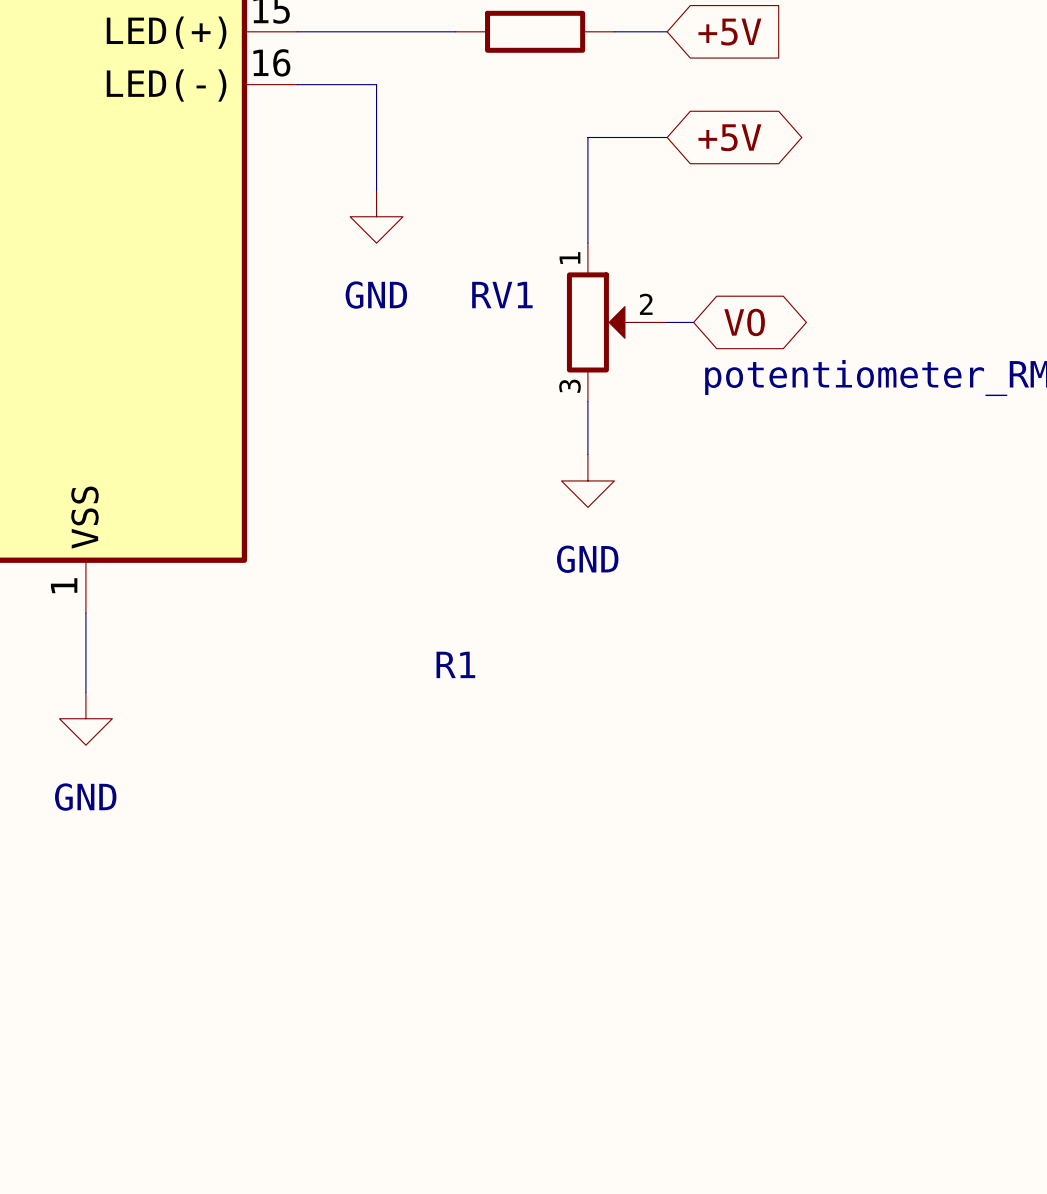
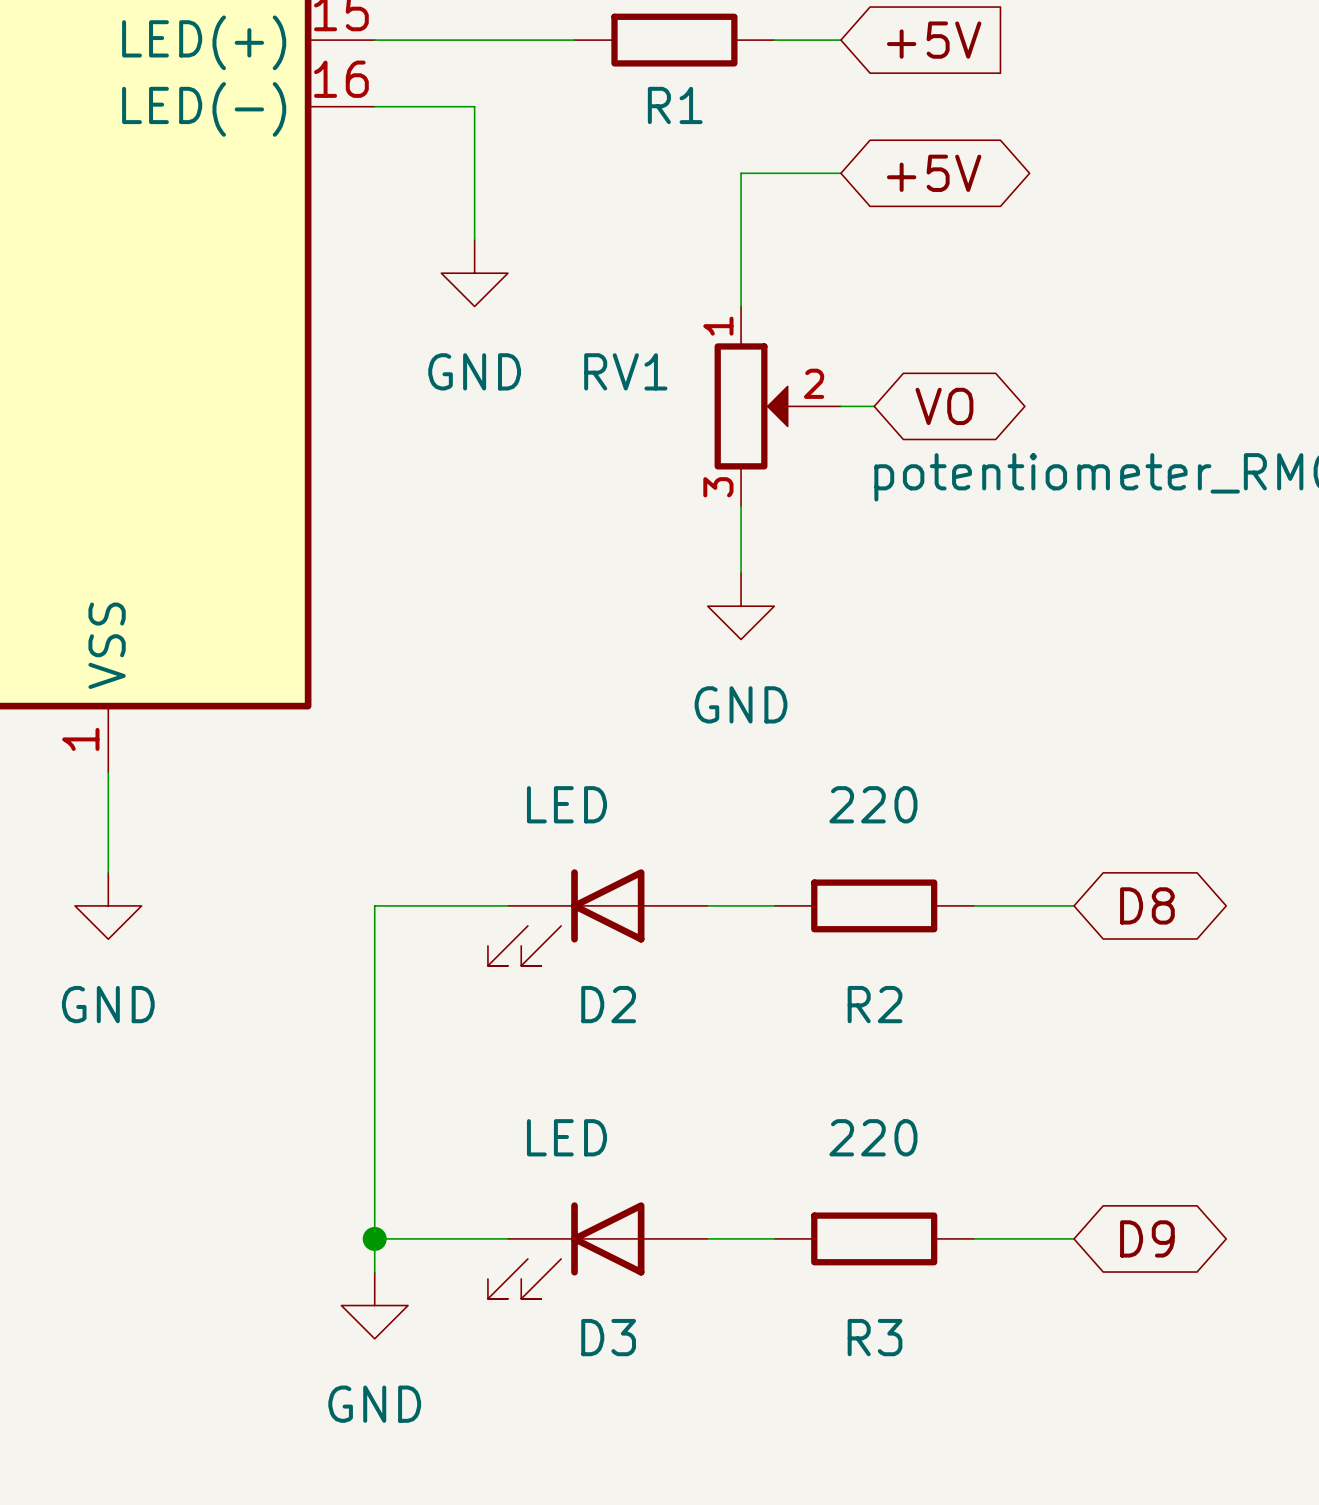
R1 name position: R1 (455, 664) -> R1 (675, 105)
wire: none -> (507, 905) (374, 905) (374, 1272)
wire: none -> (707, 905) (774, 905)
R2: none -> 220 (874, 905)
wire: none -> (974, 905) (1074, 905)
global label: none -> D8 (1147, 905)
D2: none -> LED (597, 917)
wire: none -> (374, 1238) (507, 1238)
junction: none -> (374, 1238)
wire: none -> (707, 1238) (774, 1238)
R3: none -> 220 (874, 1238)
wire: none -> (974, 1238) (1074, 1238)
global label: none -> D9 (1147, 1238)
D3: none -> LED (597, 1250)
power symbol: none -> GND (374, 1305)

